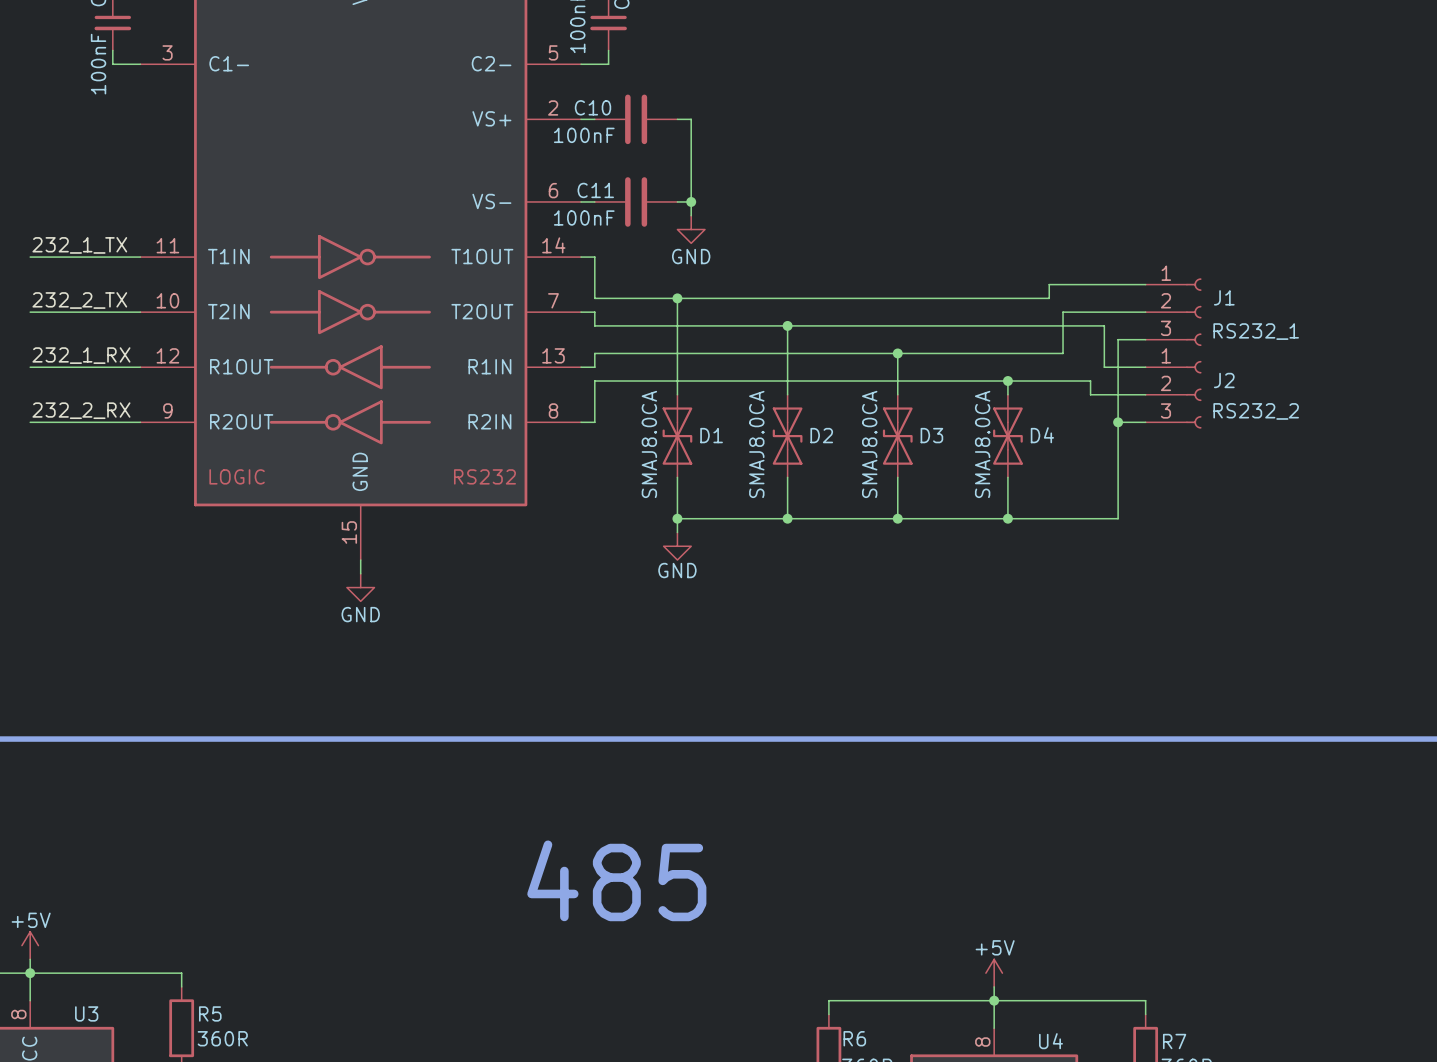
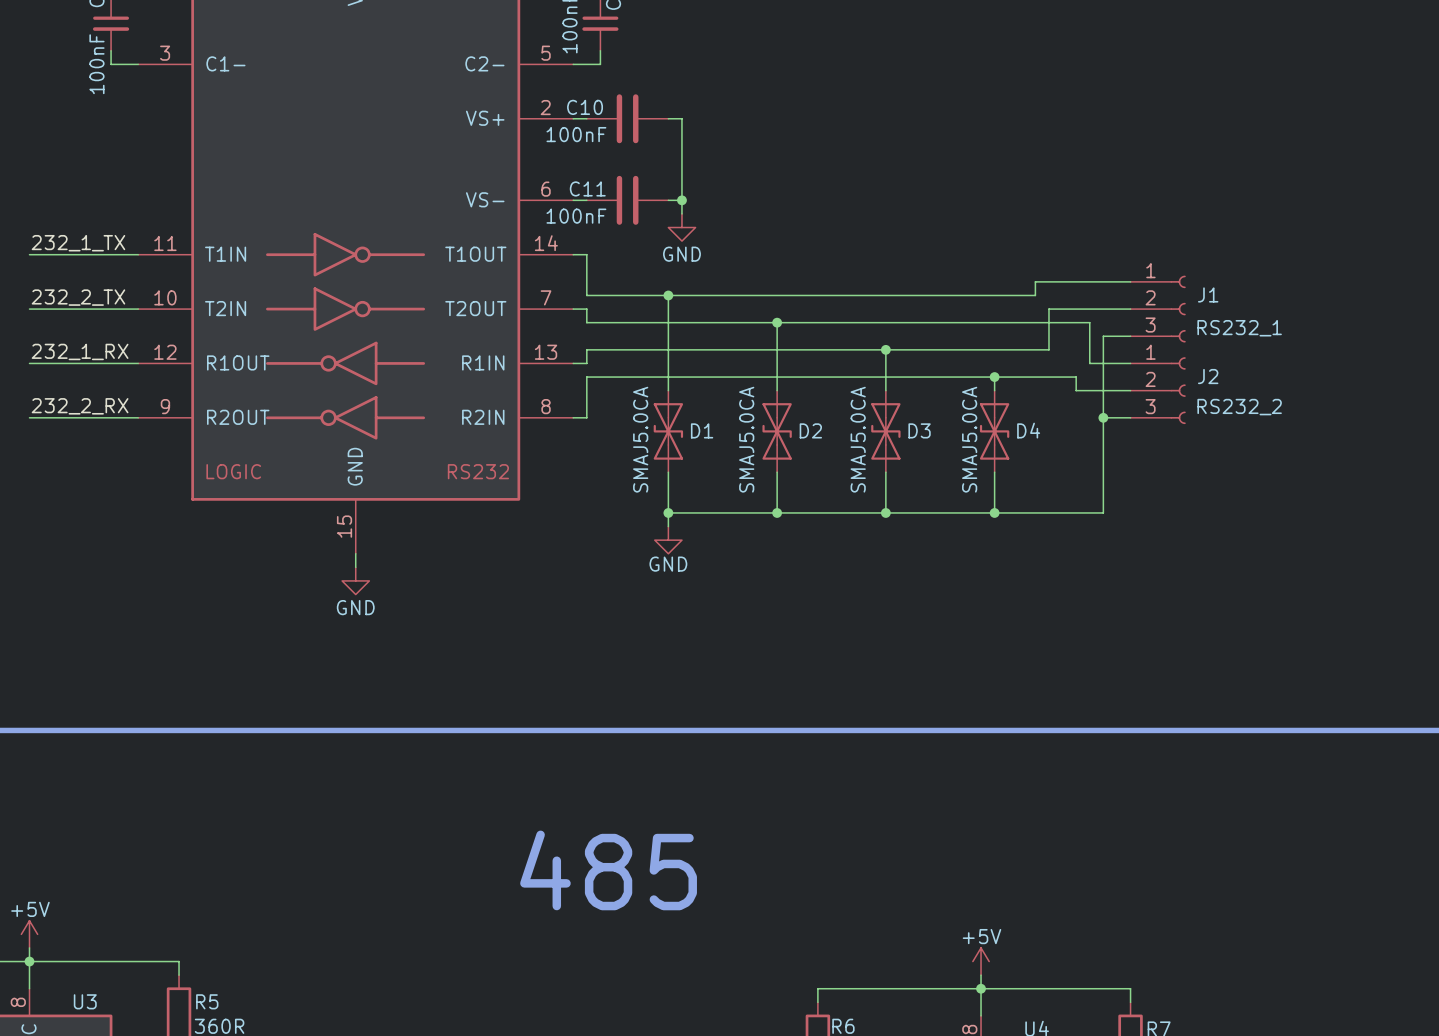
D1 value: SMAJ8.0CA (649, 444) -> SMAJ5.0CA (640, 439)
D2 value: SMAJ8.0CA (756, 444) -> SMAJ5.0CA (746, 439)
D3 value: SMAJ8.0CA (869, 444) -> SMAJ5.0CA (858, 439)
D4 value: SMAJ8.0CA (982, 444) -> SMAJ5.0CA (969, 439)

